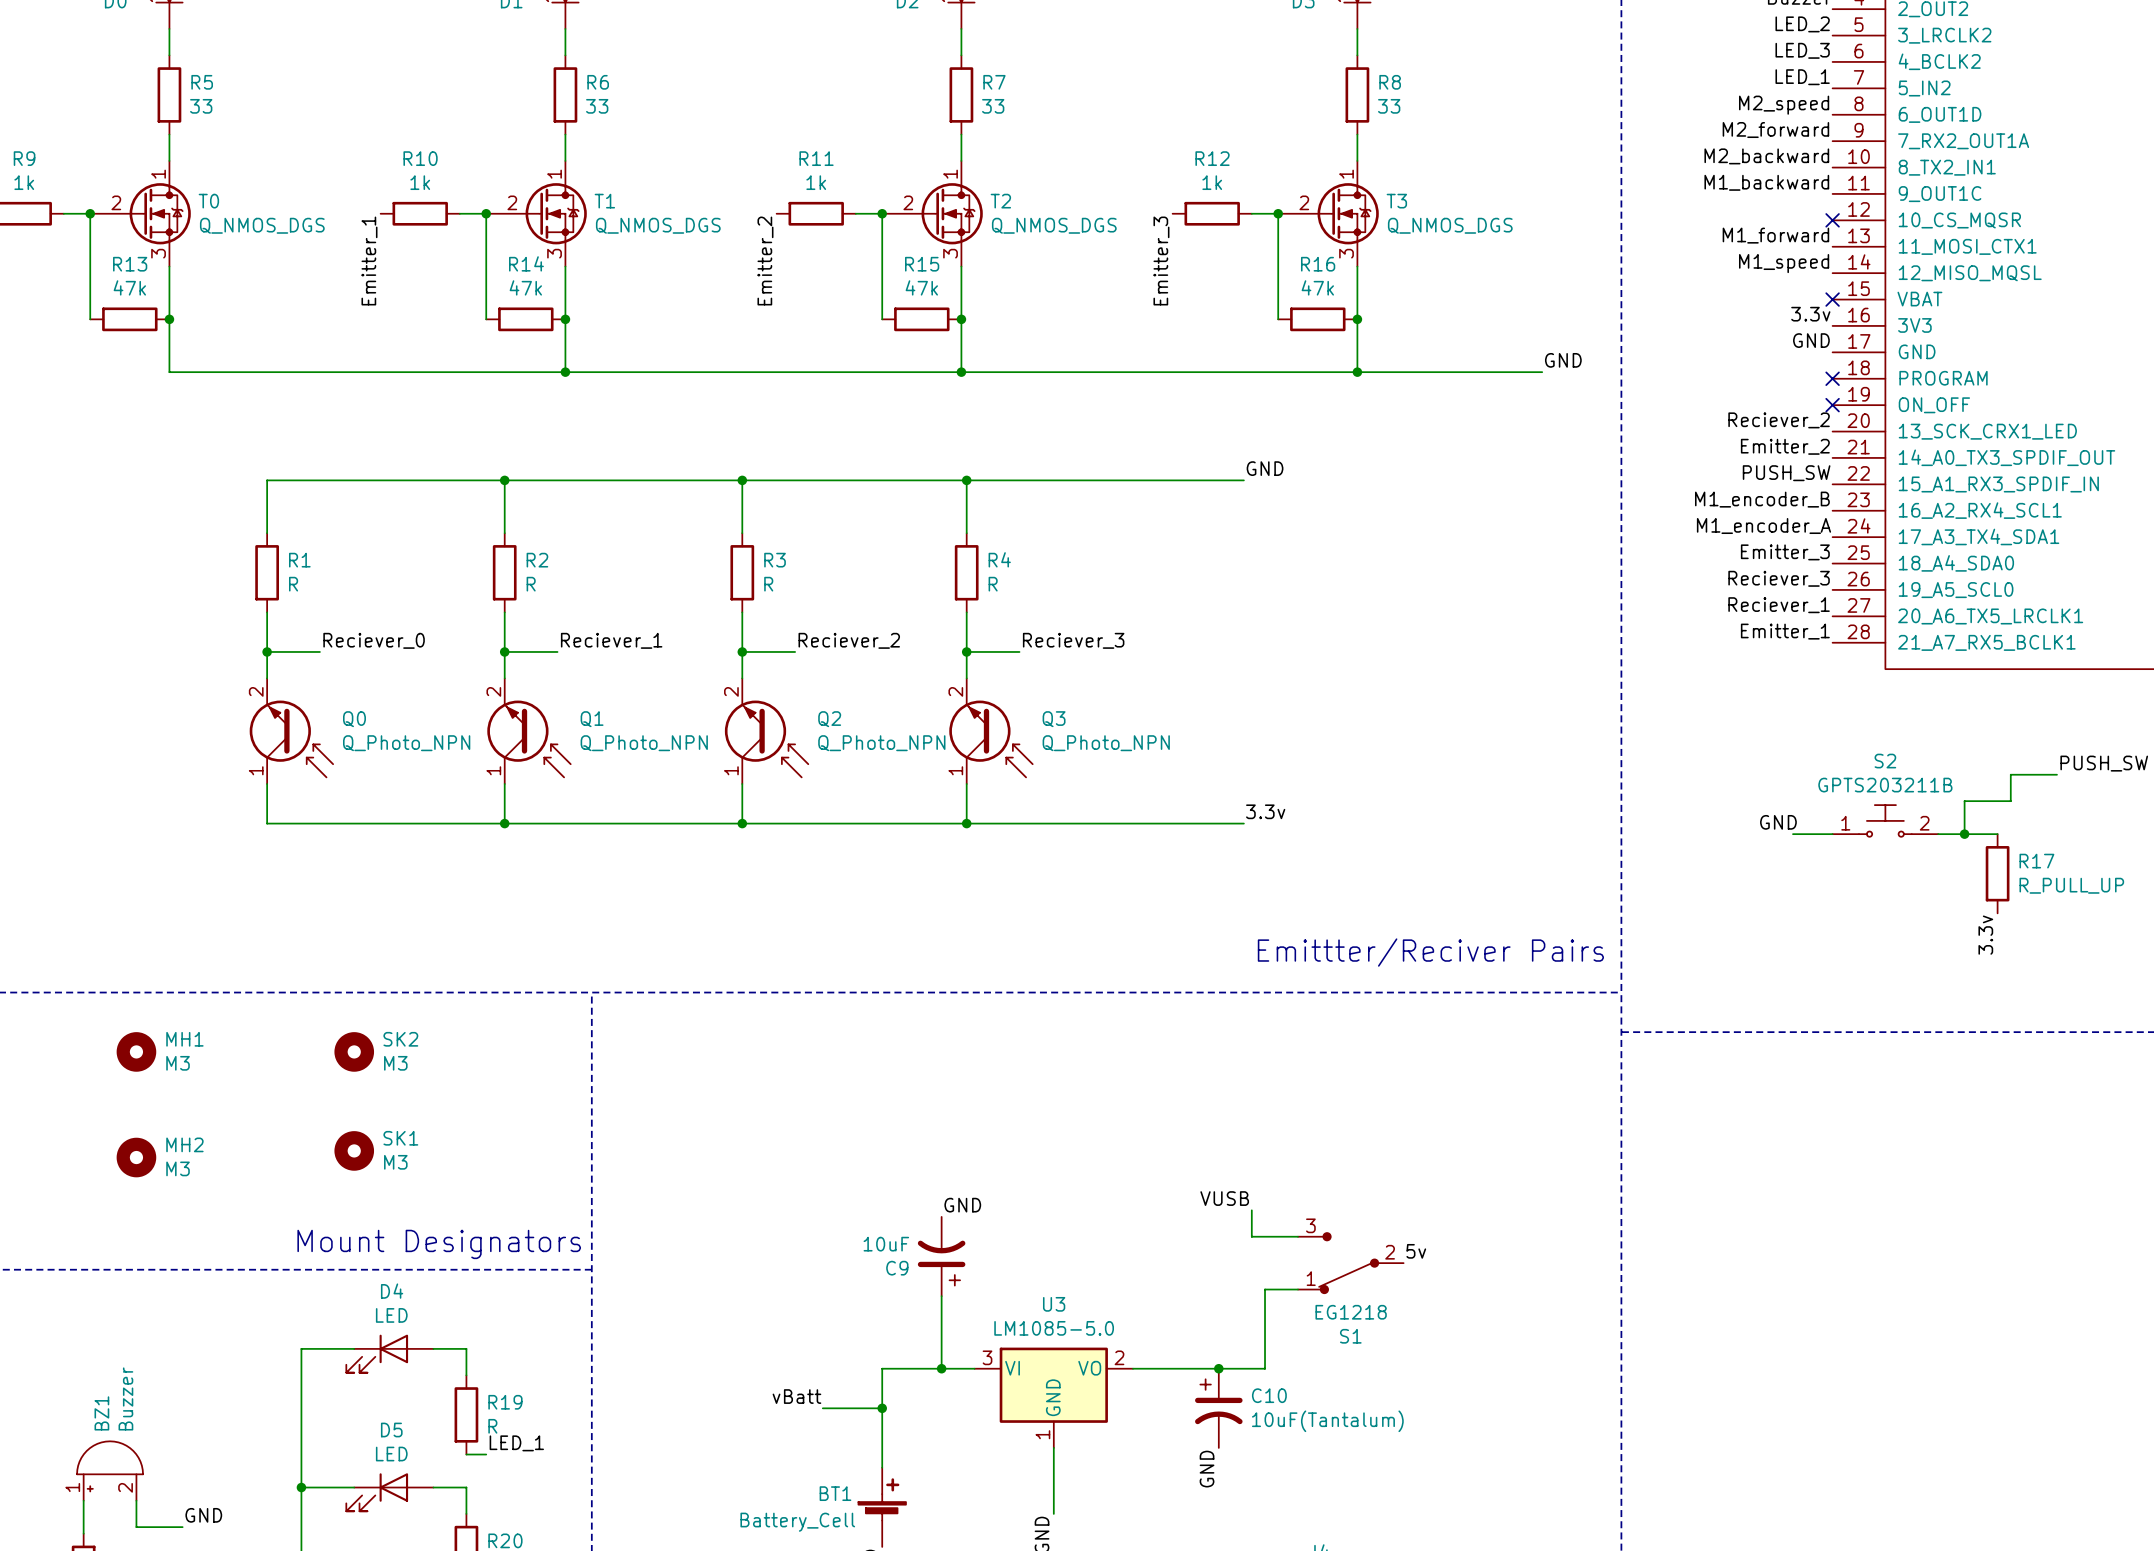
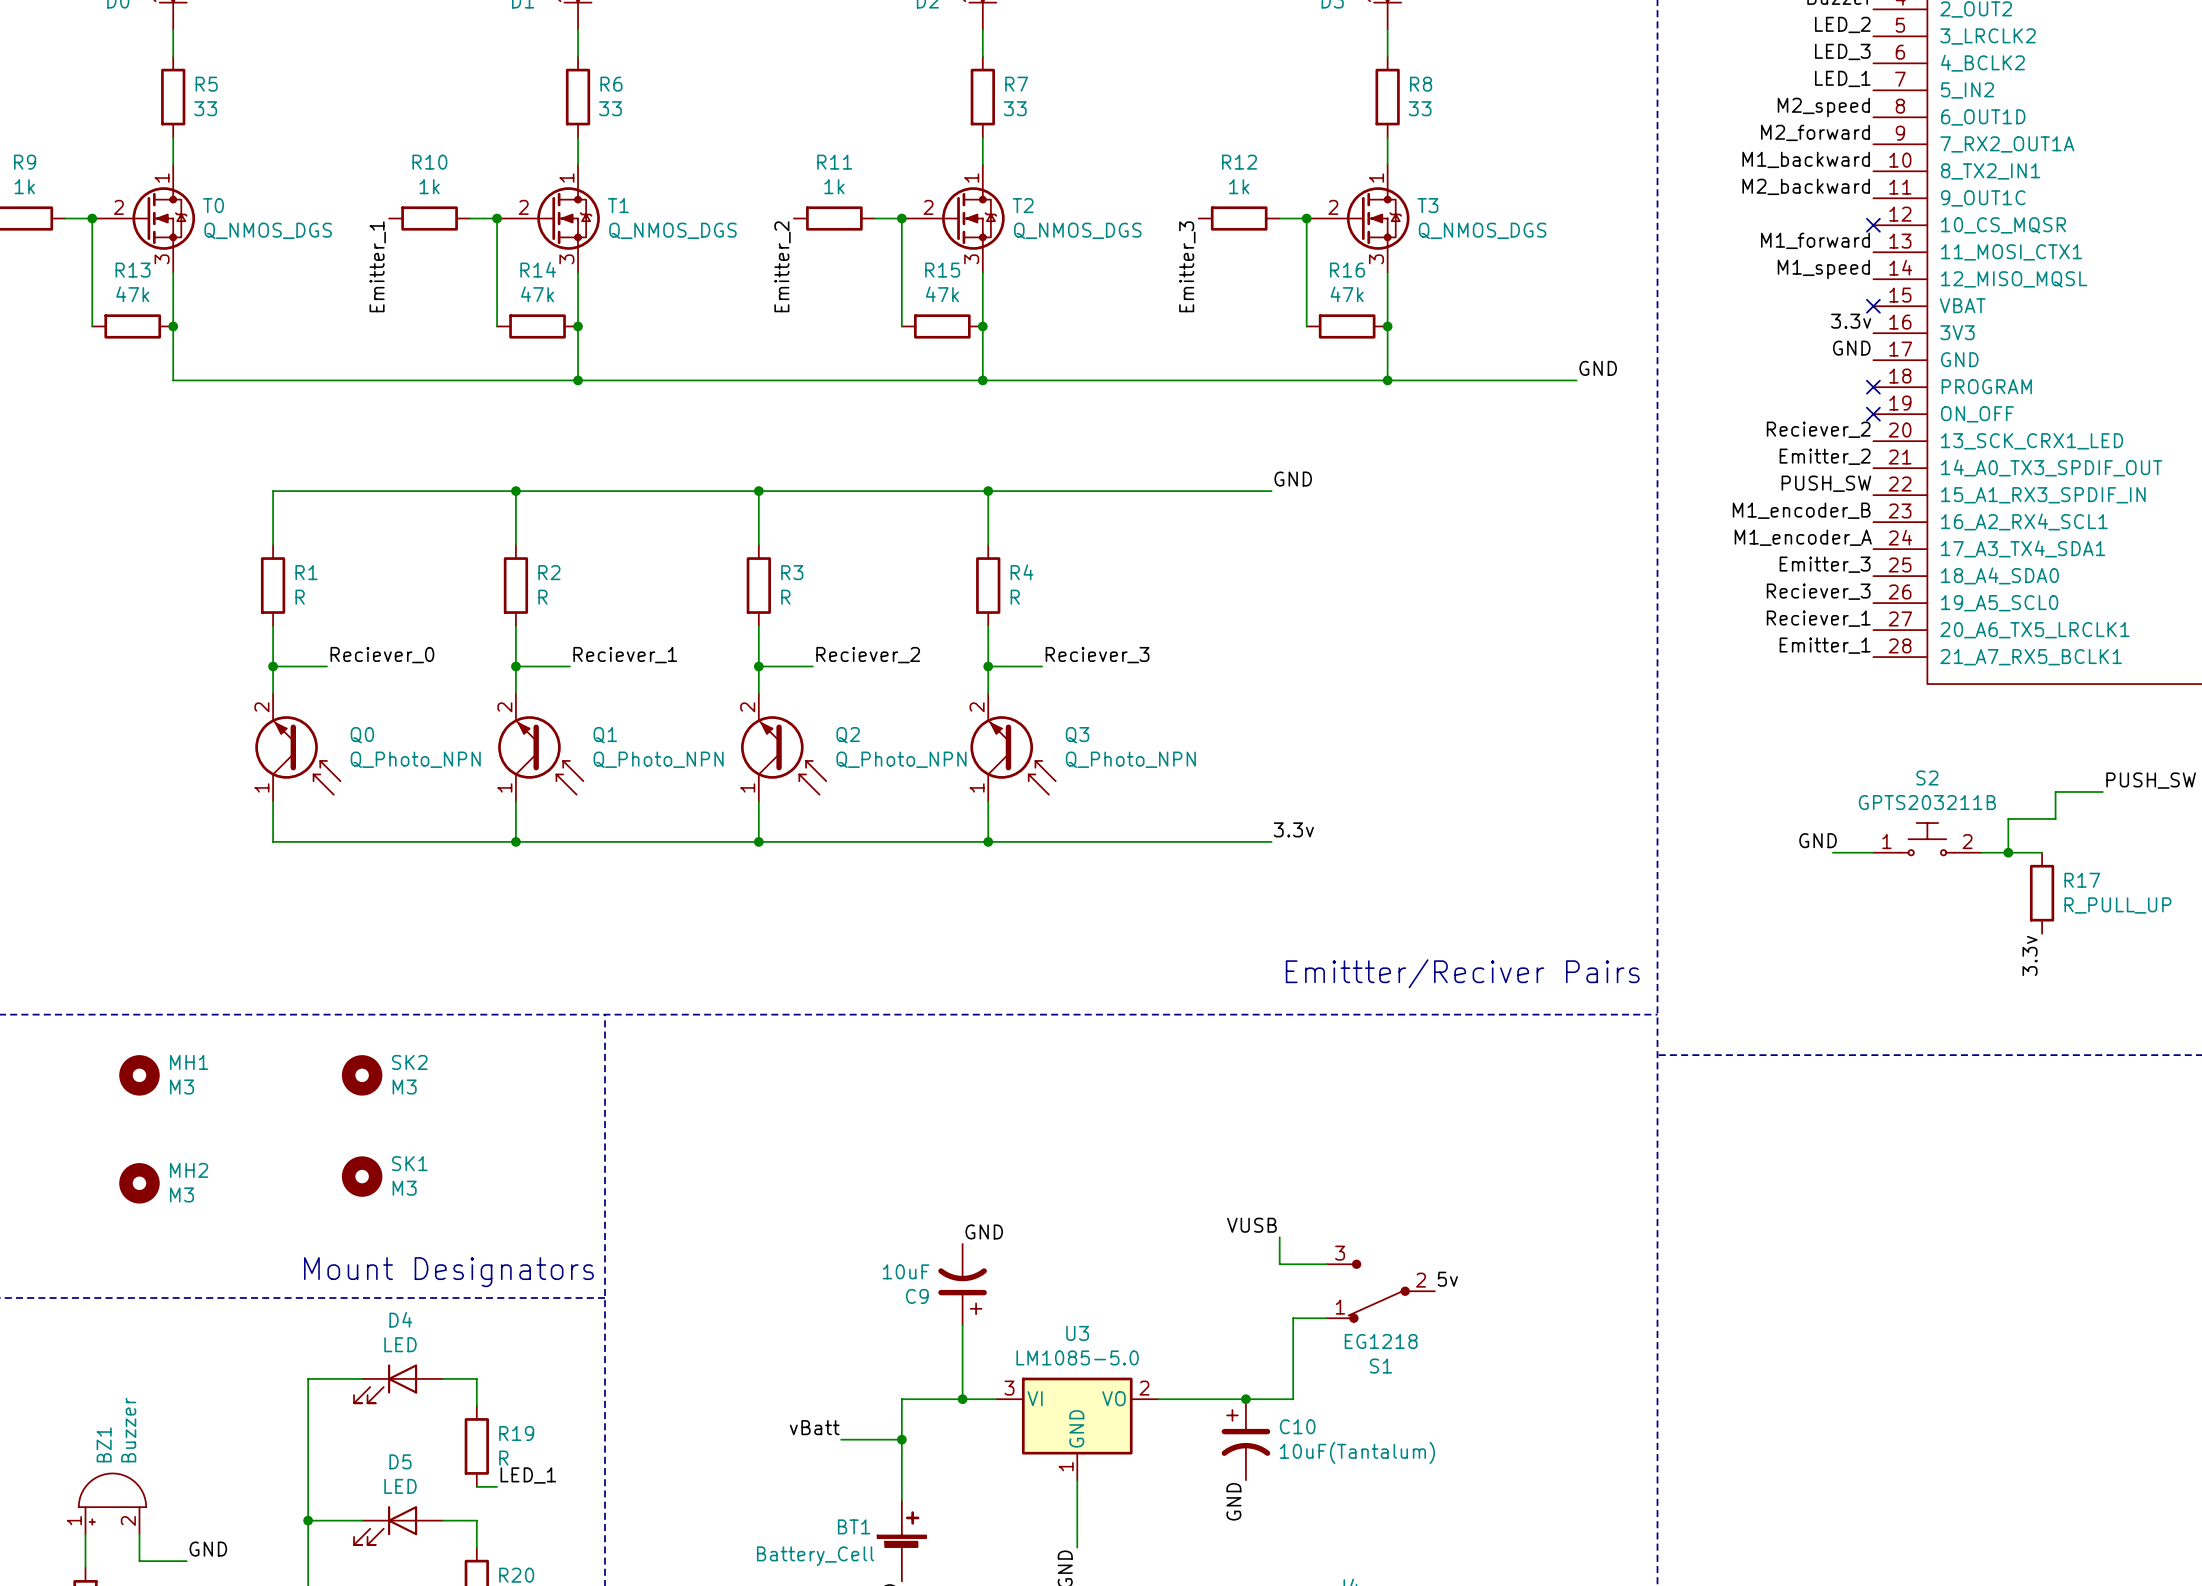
label: M2_backward (1766, 156) -> M1_backward (1806, 159)
label: M1_backward (1766, 182) -> M2_backward (1806, 186)

